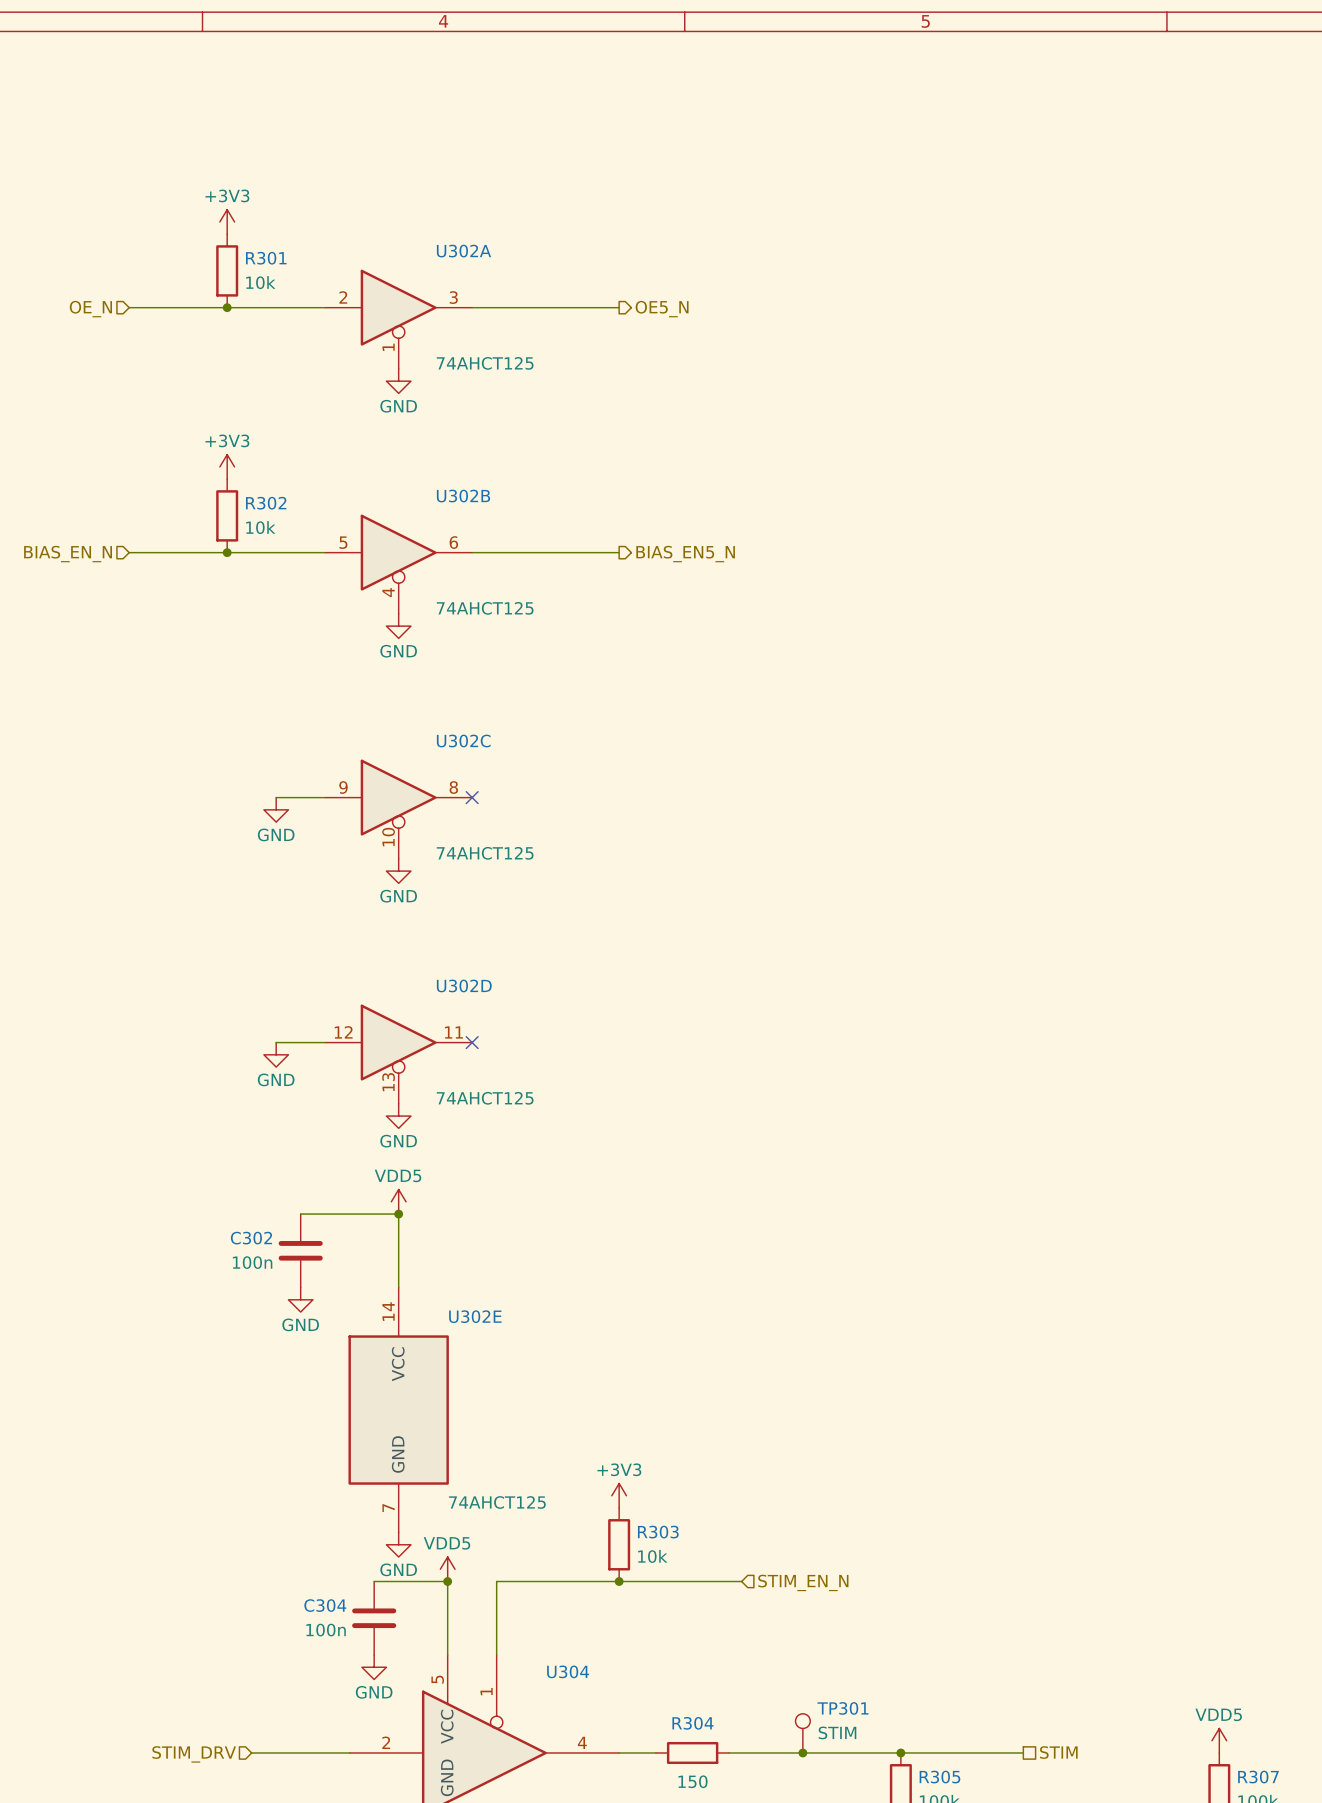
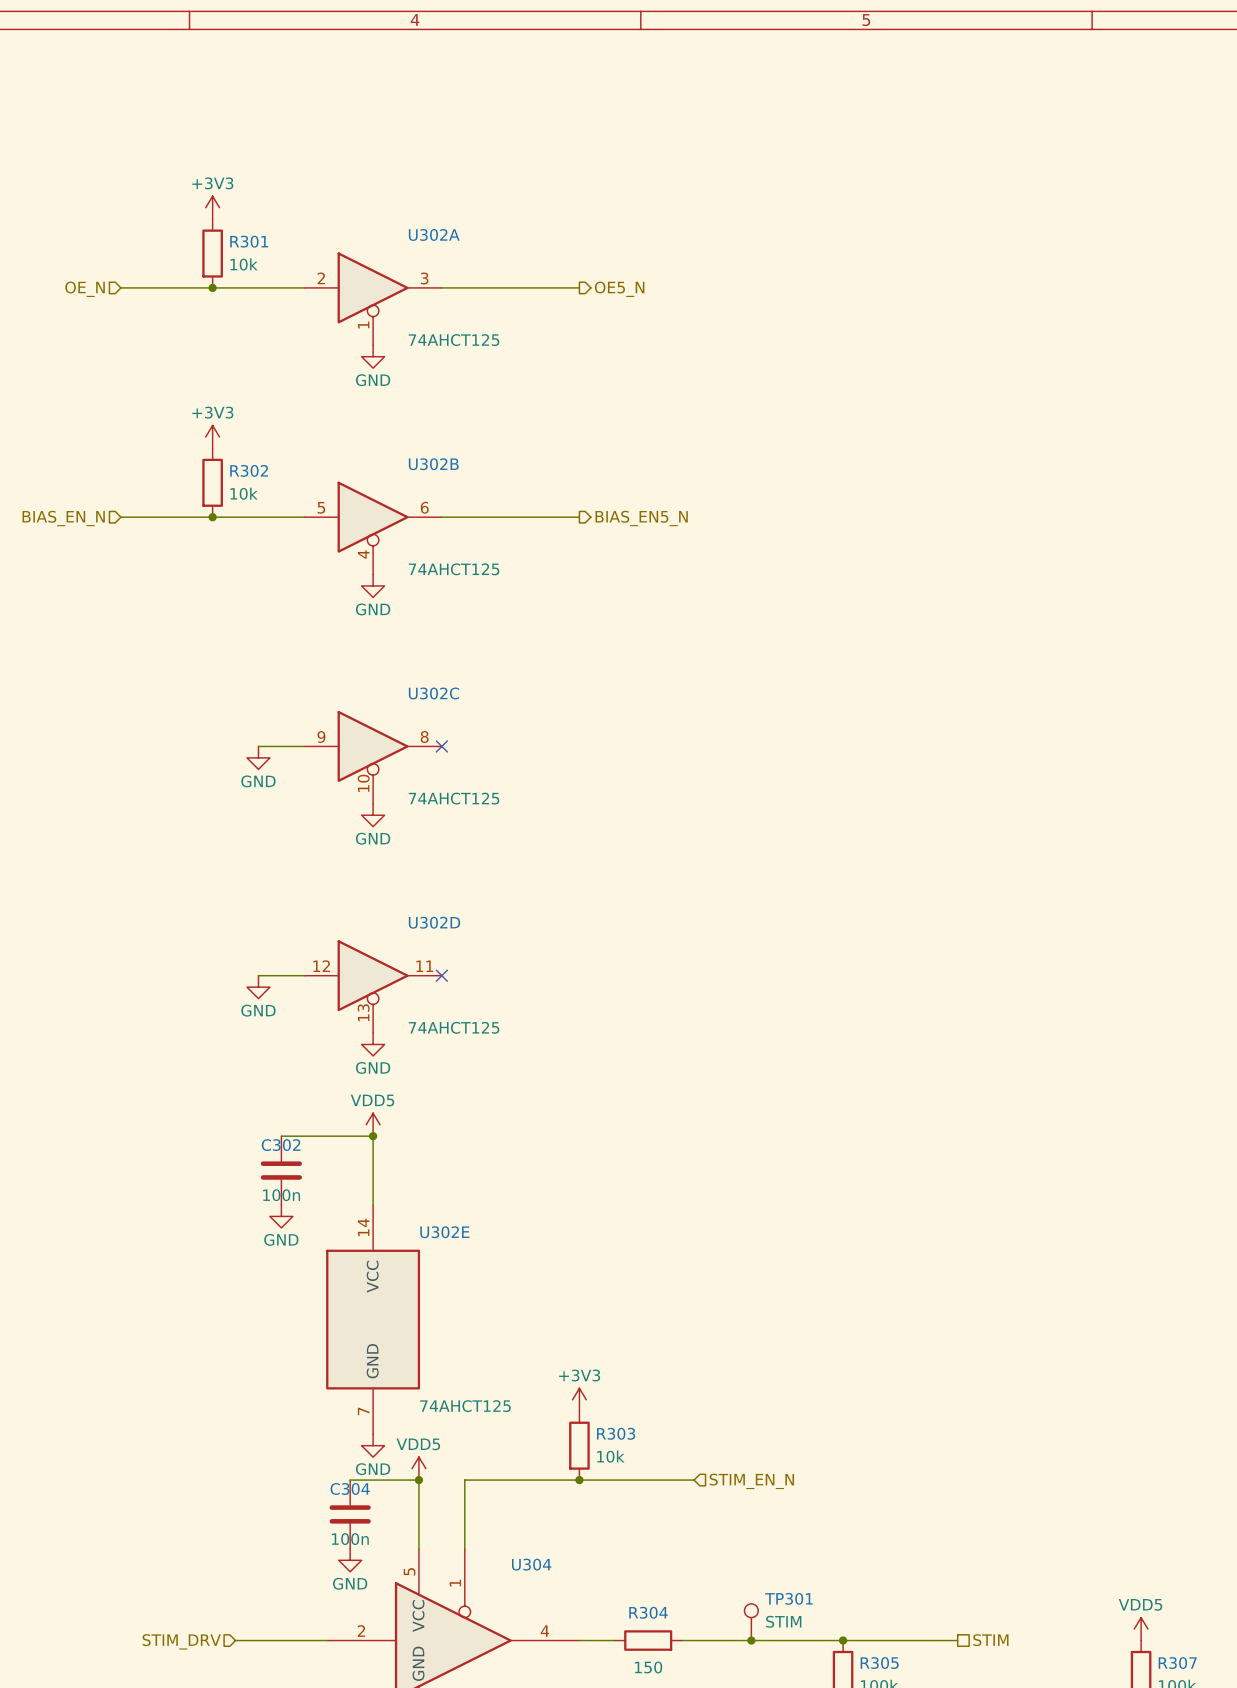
C302 name position: C302 (251, 1238) -> C302 (281, 1145)
C302 value position: 100n (252, 1262) -> 100n (281, 1195)
C304 name position: C304 (325, 1605) -> C304 (350, 1488)
C304 value position: 100n (326, 1630) -> 100n (350, 1539)

